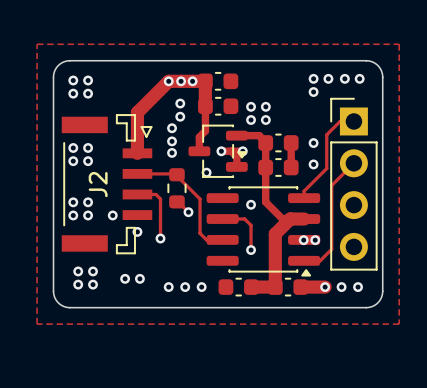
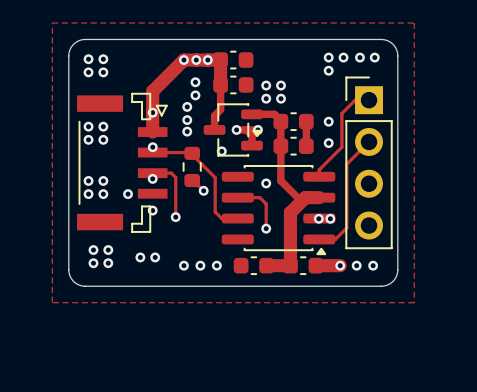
via: none -> (152, 112)
via: none -> (152, 147)
J2 name: J2 (98, 184) -> none
via: none -> (152, 178)

